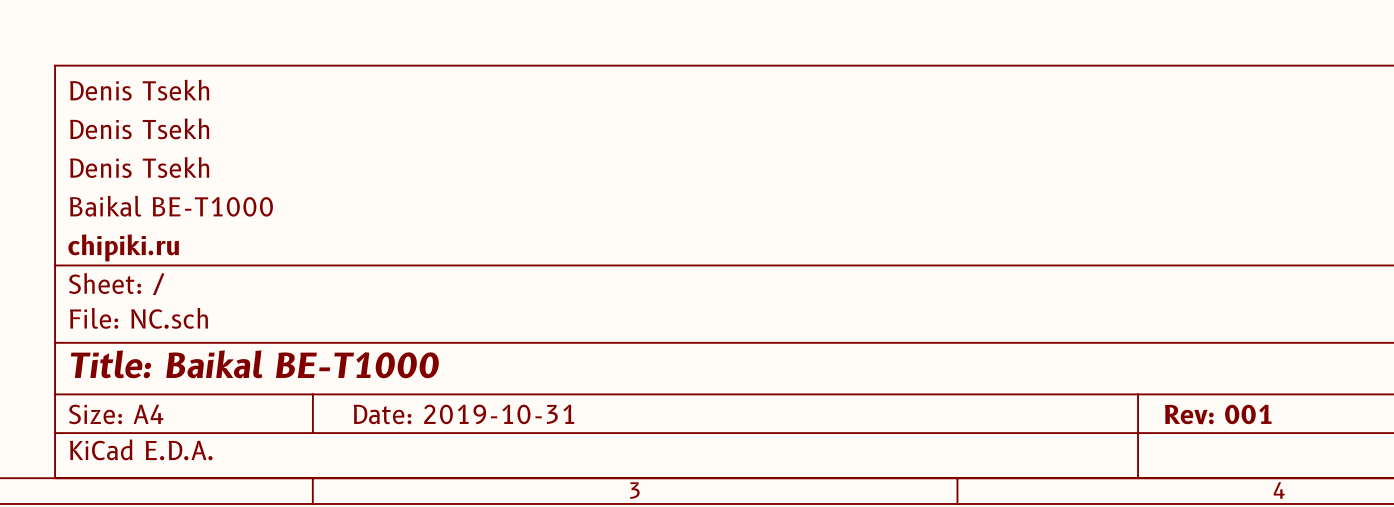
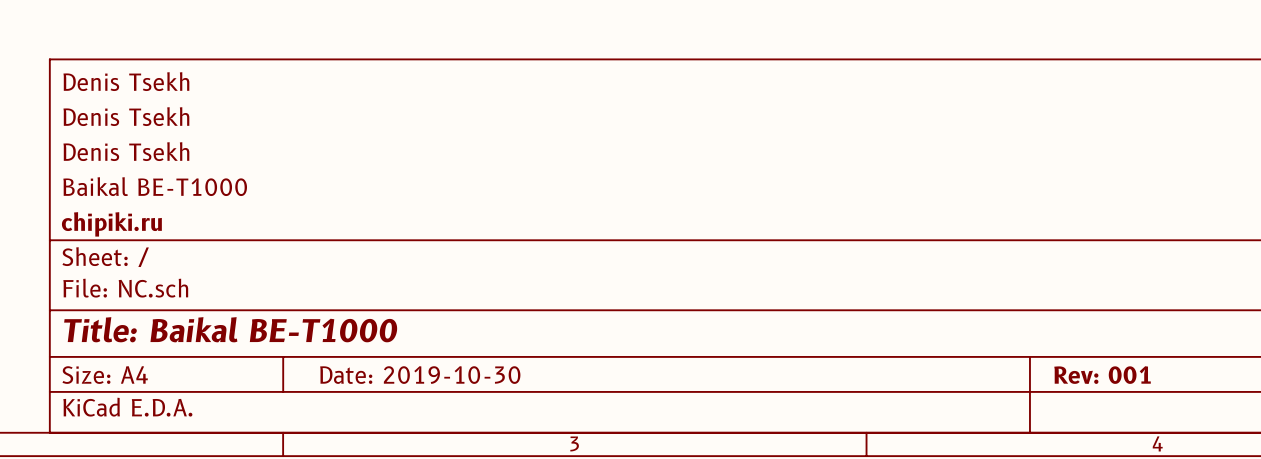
title block: Date: 2019-10-31 (464, 414) -> Date: 2019-10-30 (420, 375)

